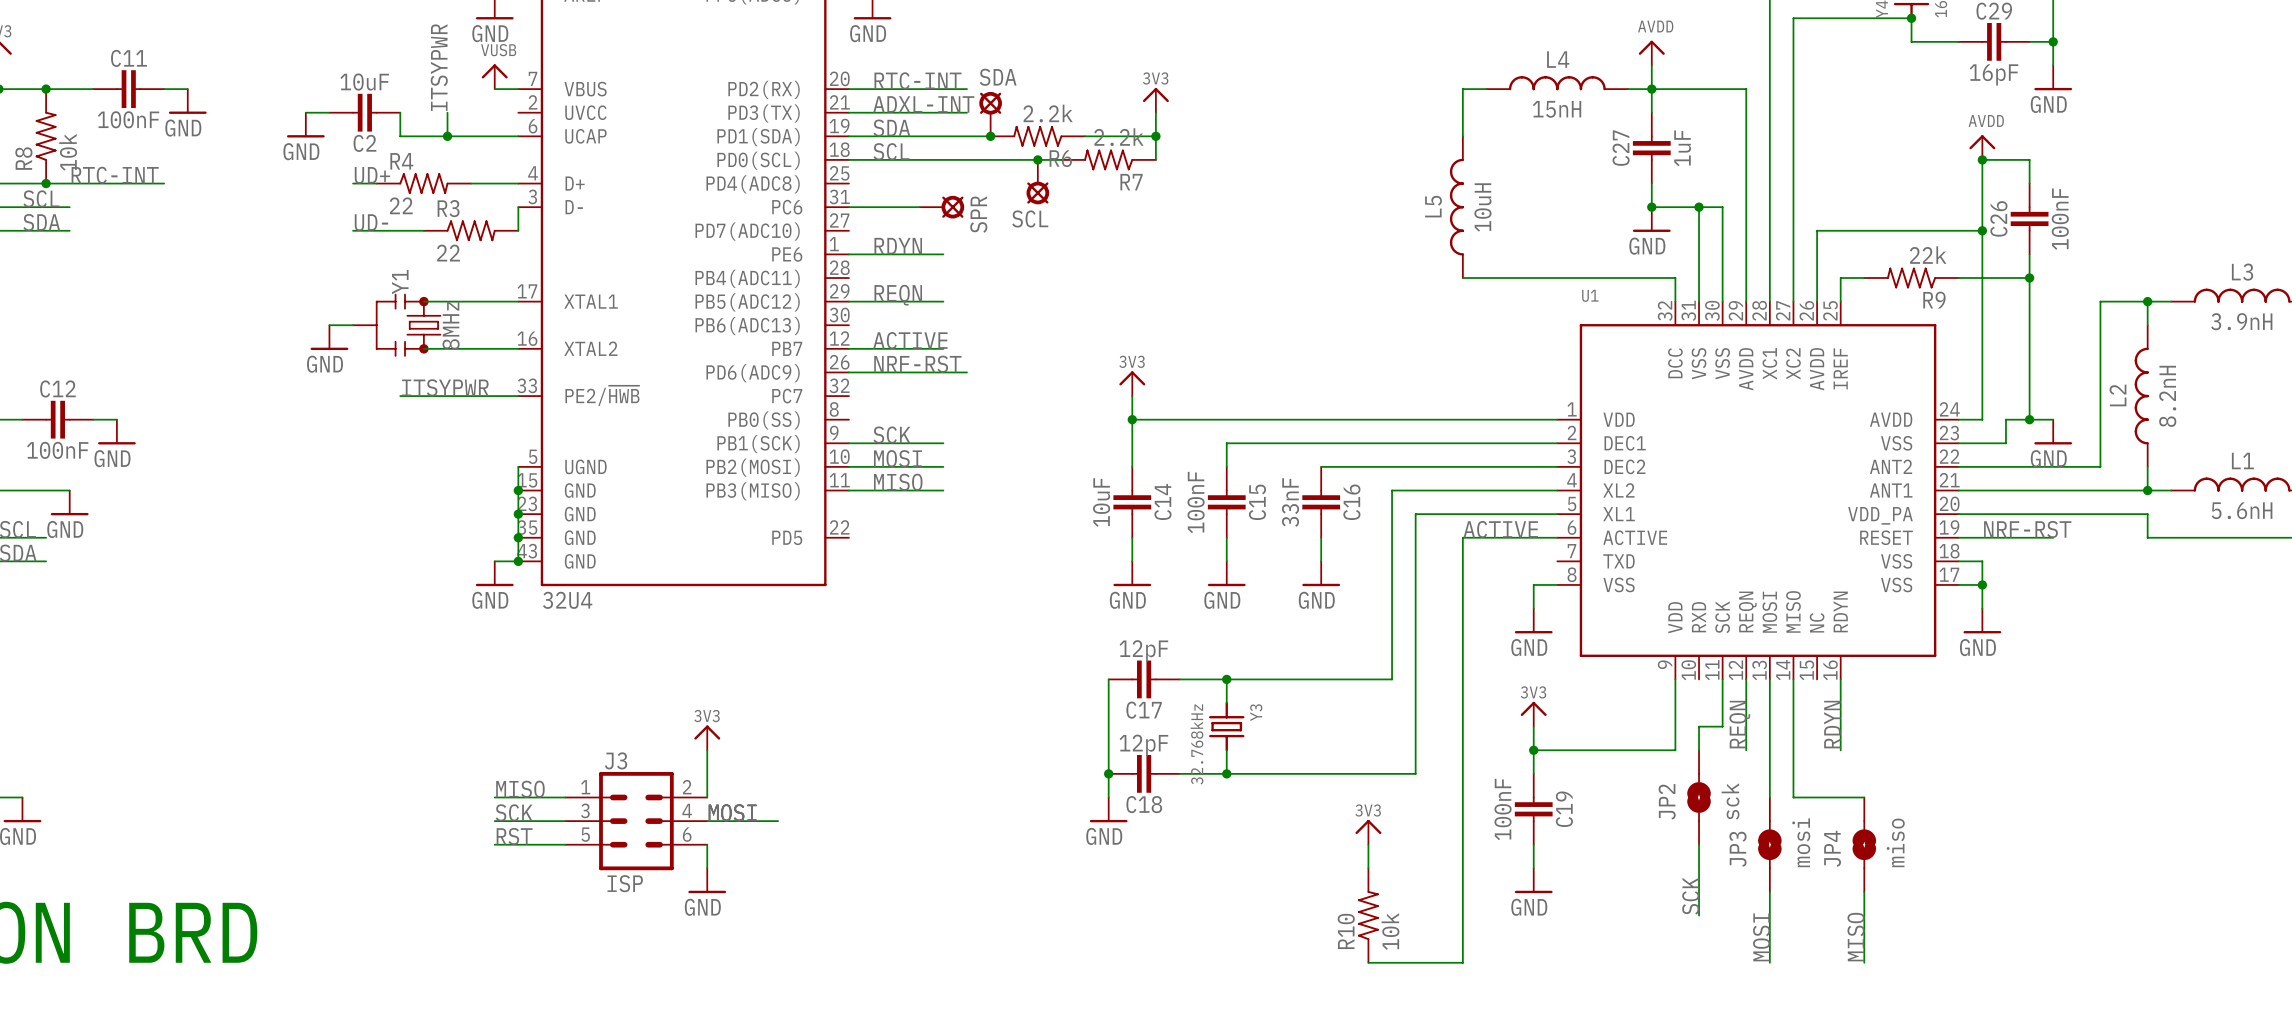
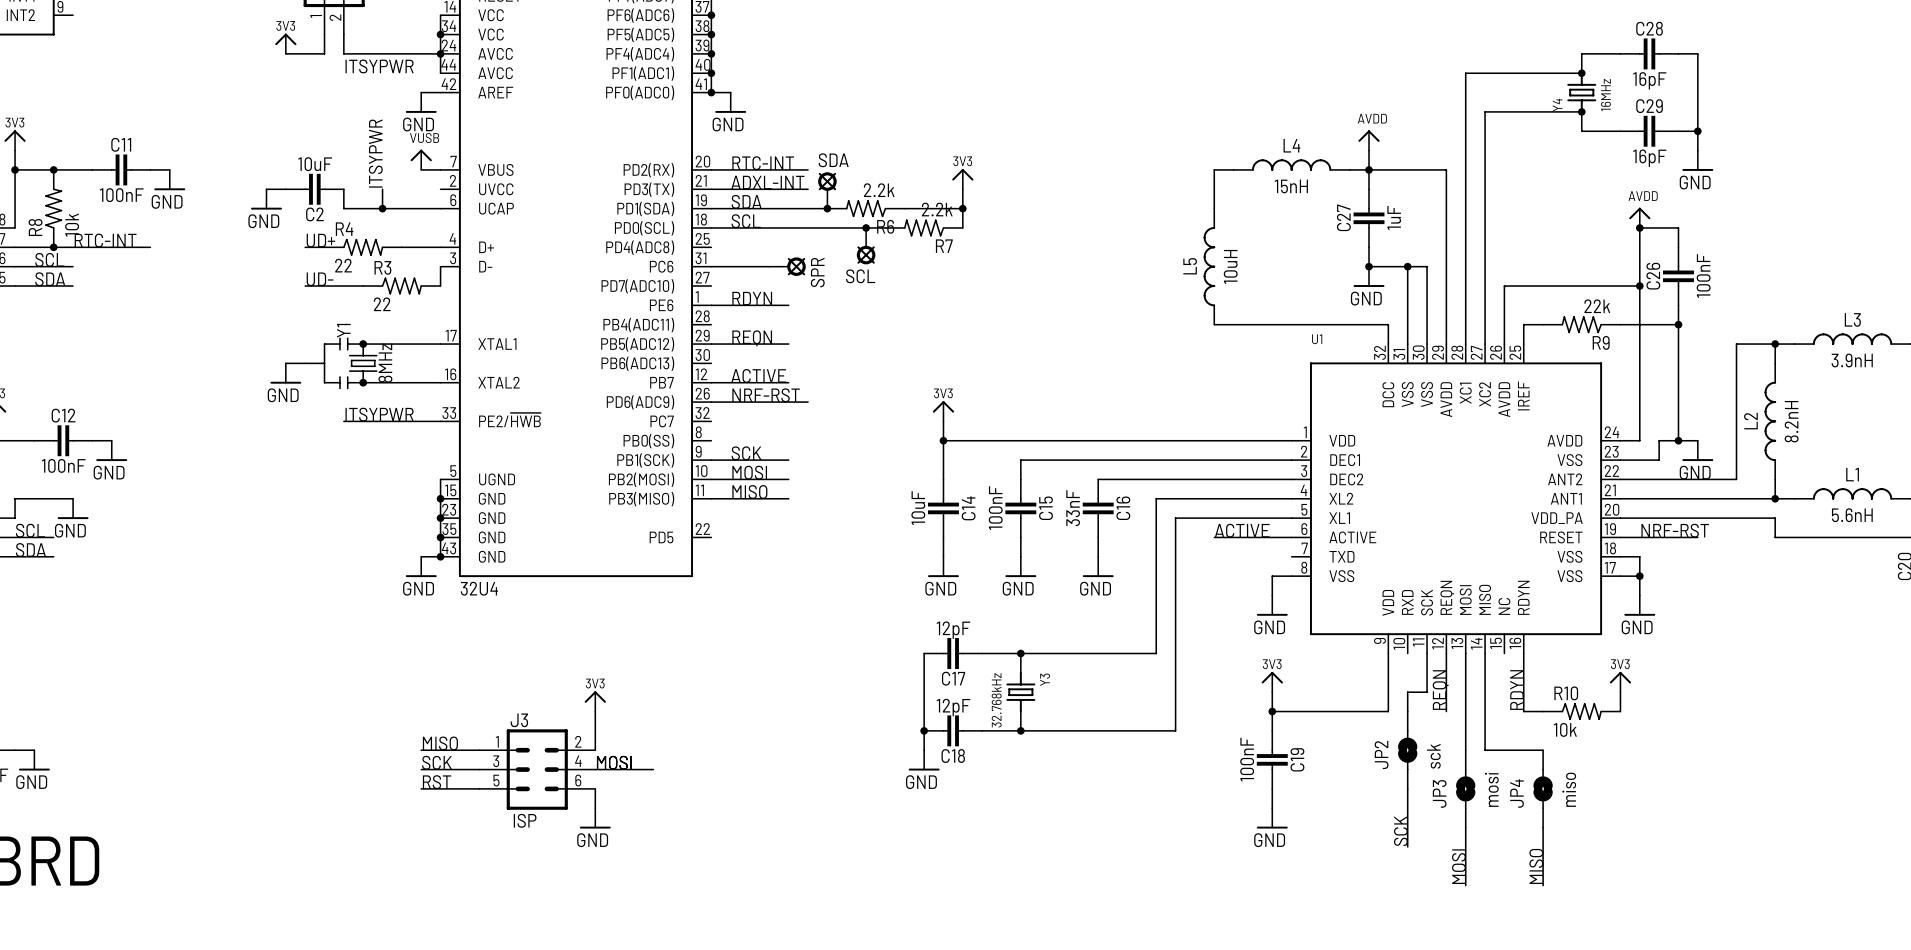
wire: (1462, 537) (1462, 962) (1368, 962) -> none
power symbol: none -> 3V3 (1620, 682)
wire: none -> (1620, 692) (1620, 711)
wire: none -> (1523, 711) (1543, 711)
power symbol: 3V3 (1368, 832) -> none
wire: (1368, 844) (1368, 868) -> none
R10 rotation: 0° (1368, 915) -> 90° clockwise (1581, 711)
R10 position: (1368, 915) -> (1581, 711)

